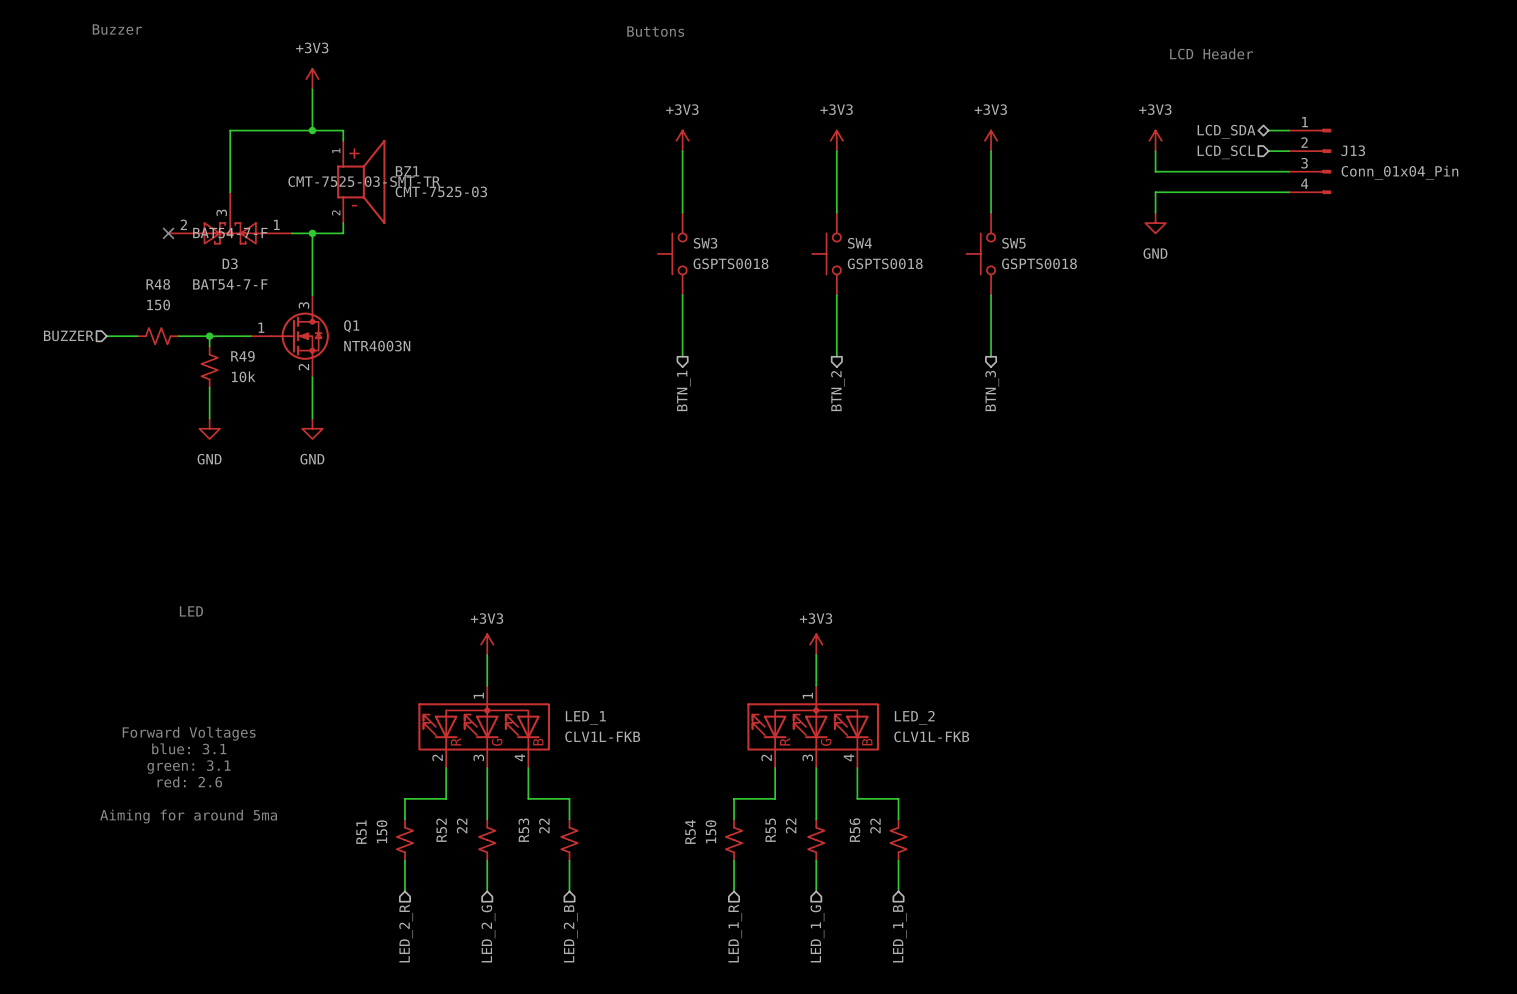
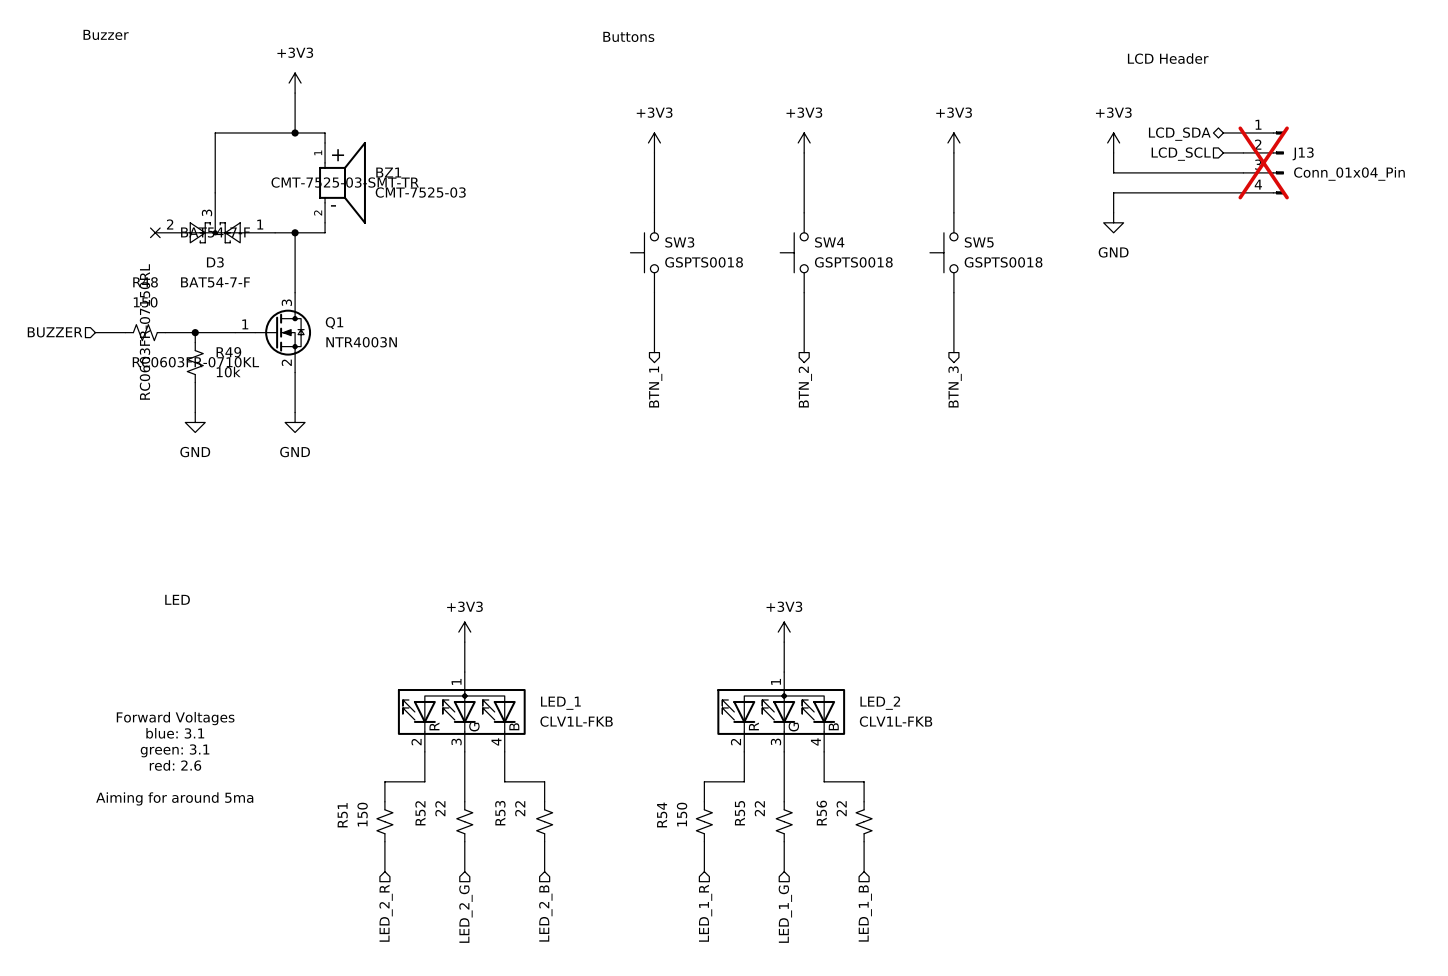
J13 do-not-place cross: none -> (1263, 162)
R48 text: none -> RC0603FR-07150RL (144, 332)
R49 text: none -> RC0603FR-0710KL (195, 362)

